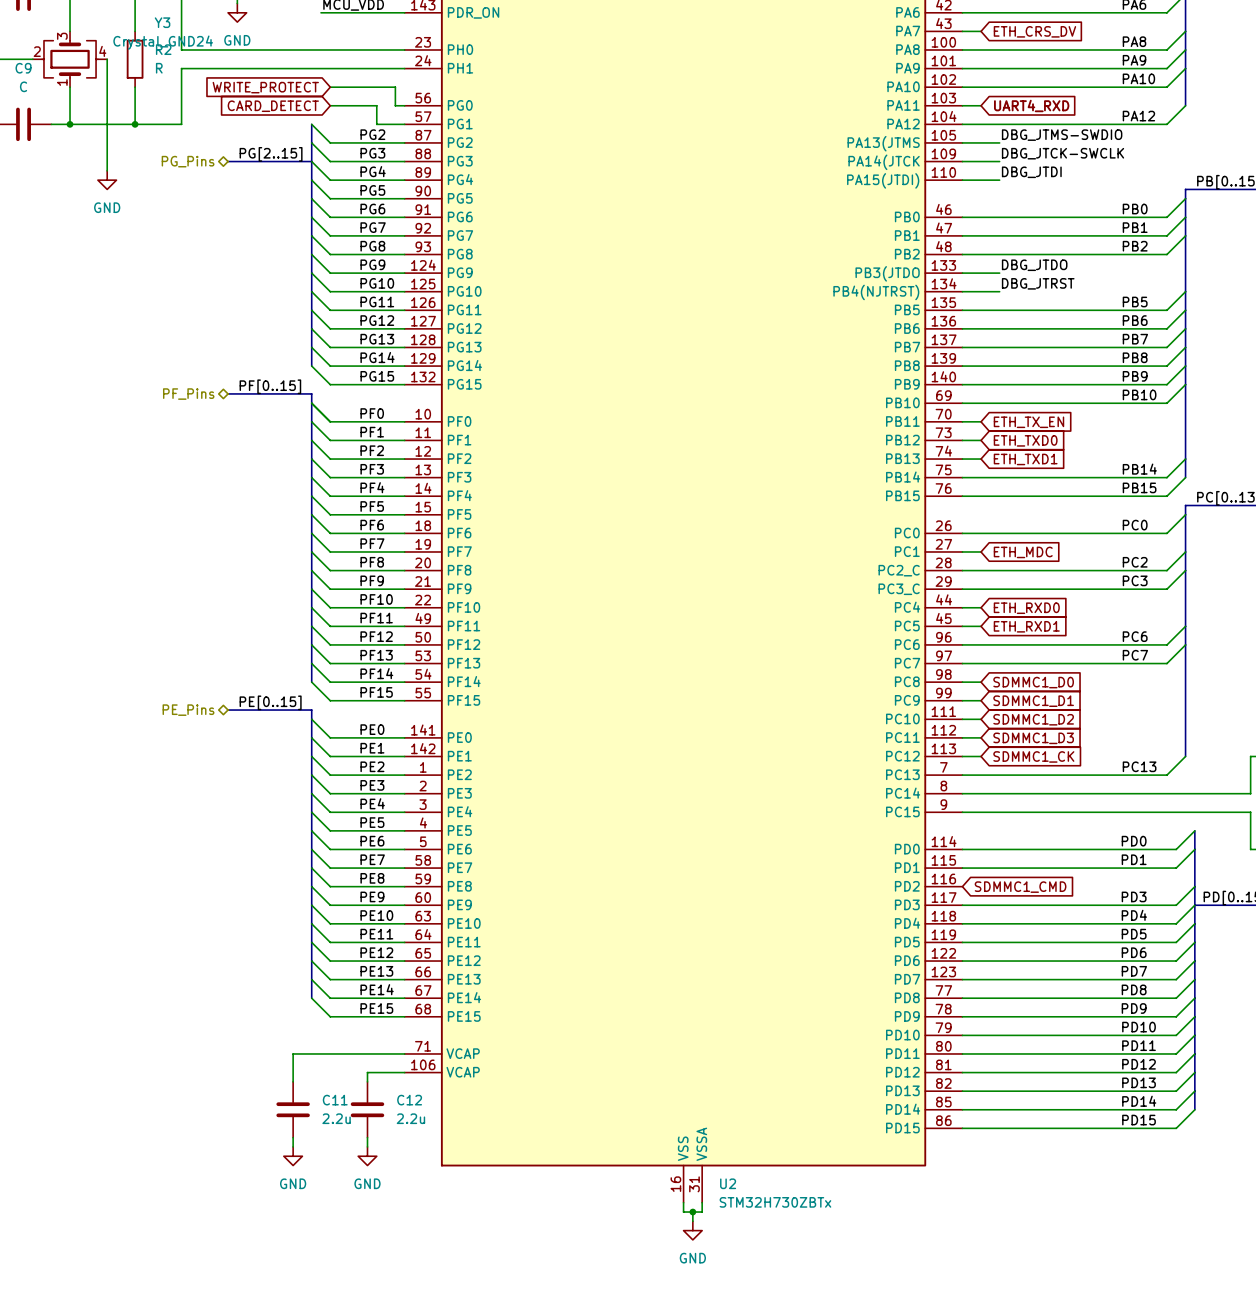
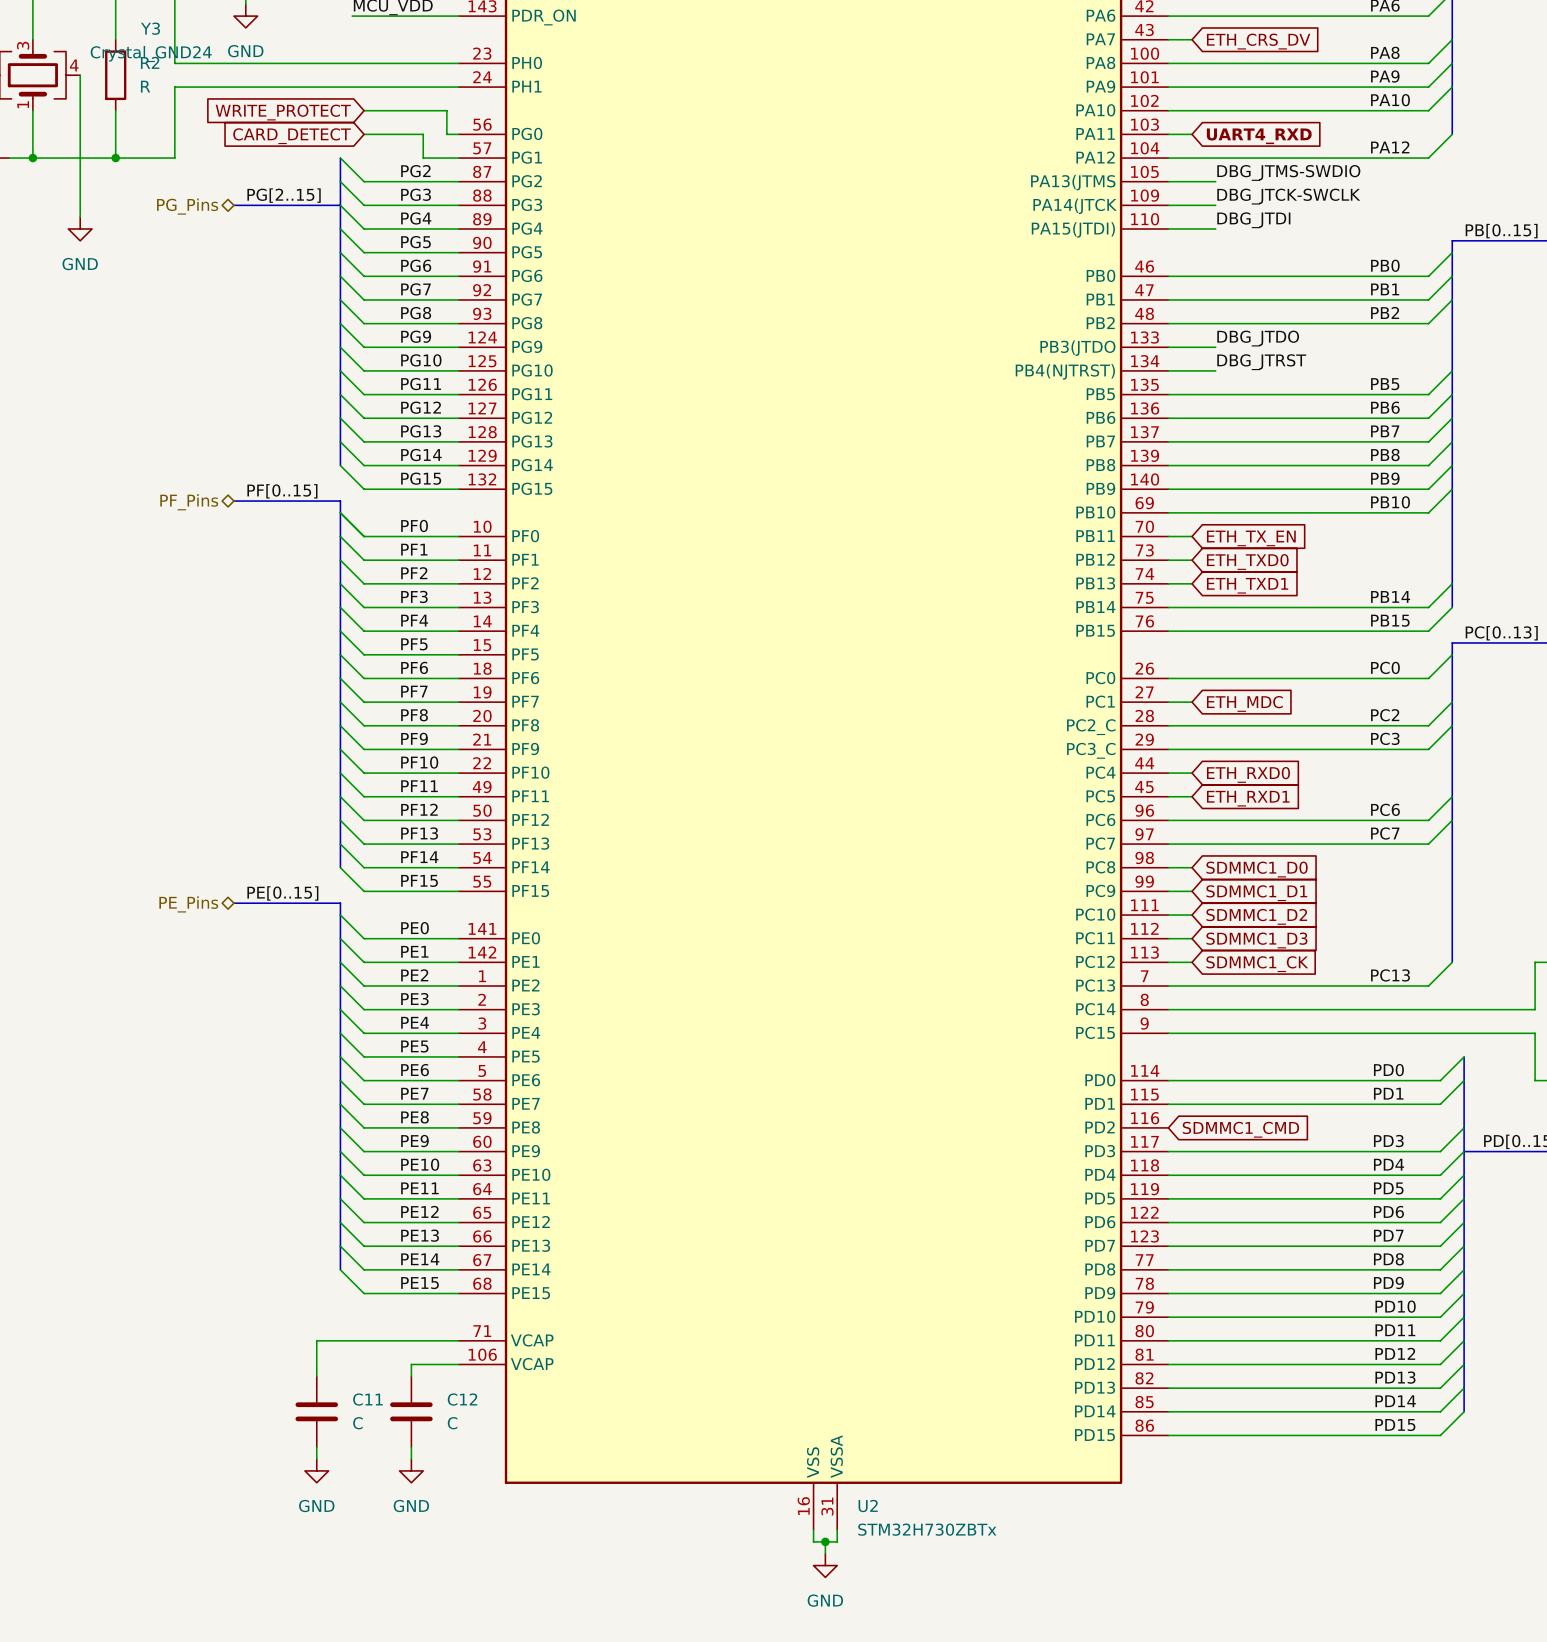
C11 value: 2.2u (336, 1118) -> C (357, 1423)
C12 value: 2.2u (410, 1118) -> C (452, 1423)

